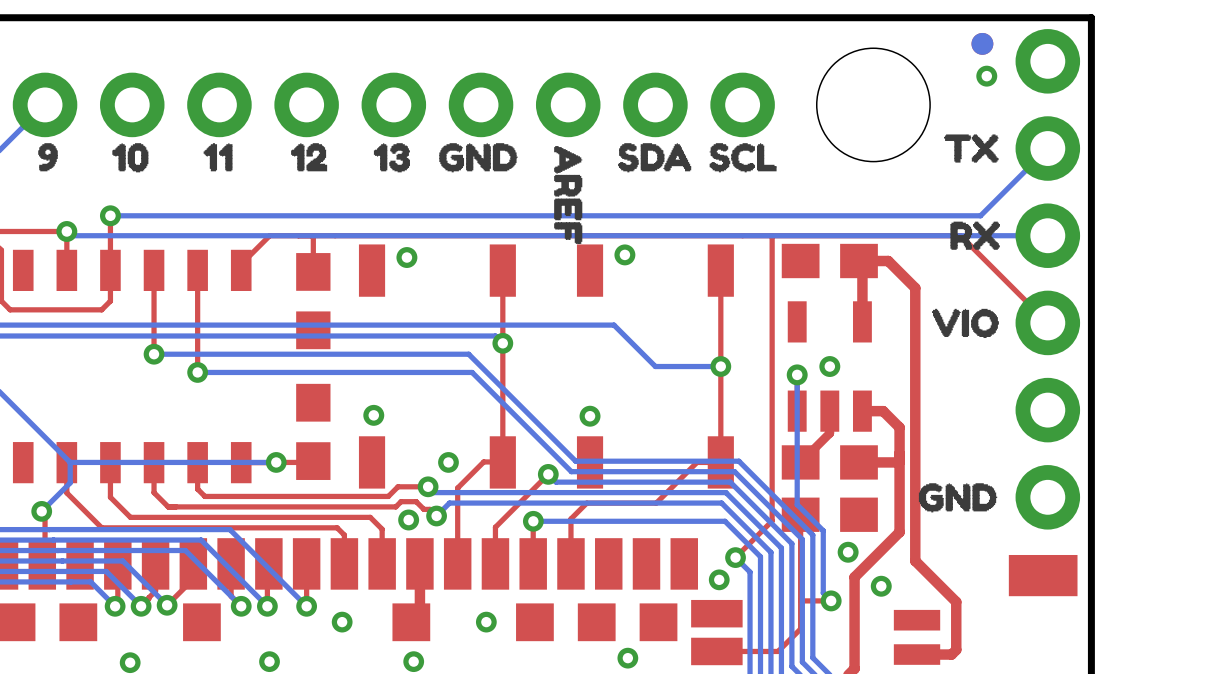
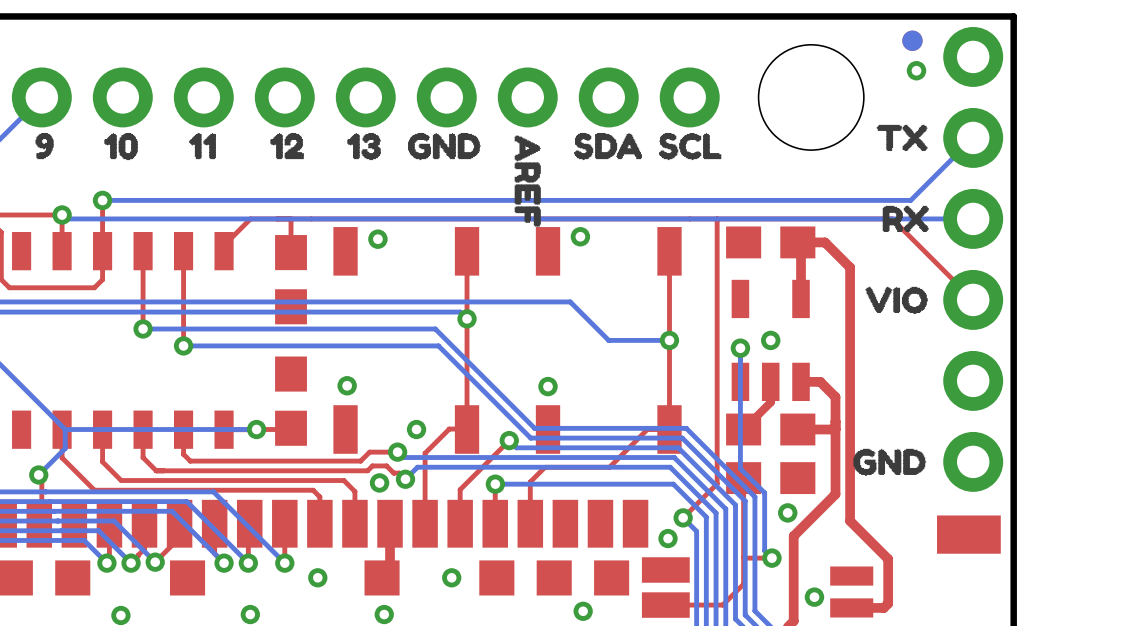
via: (881, 586) -> none
via: none -> (814, 597)

